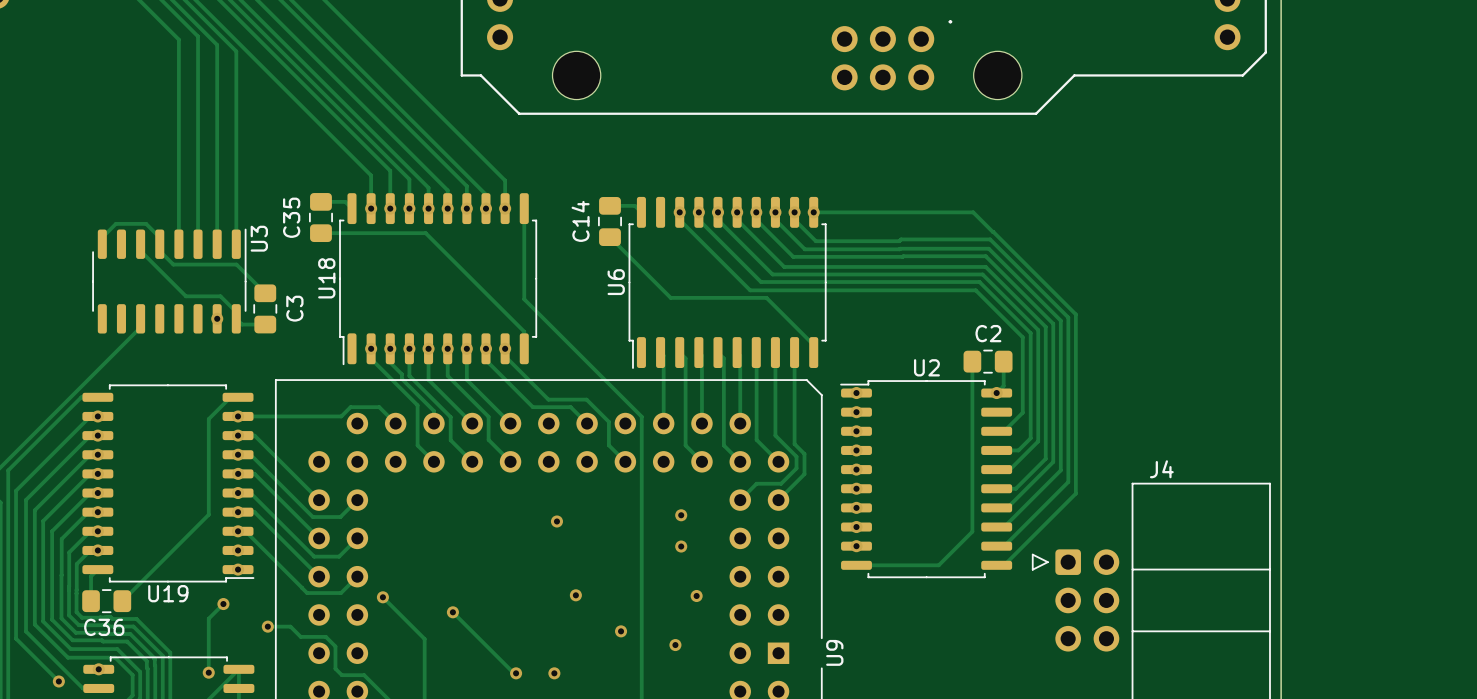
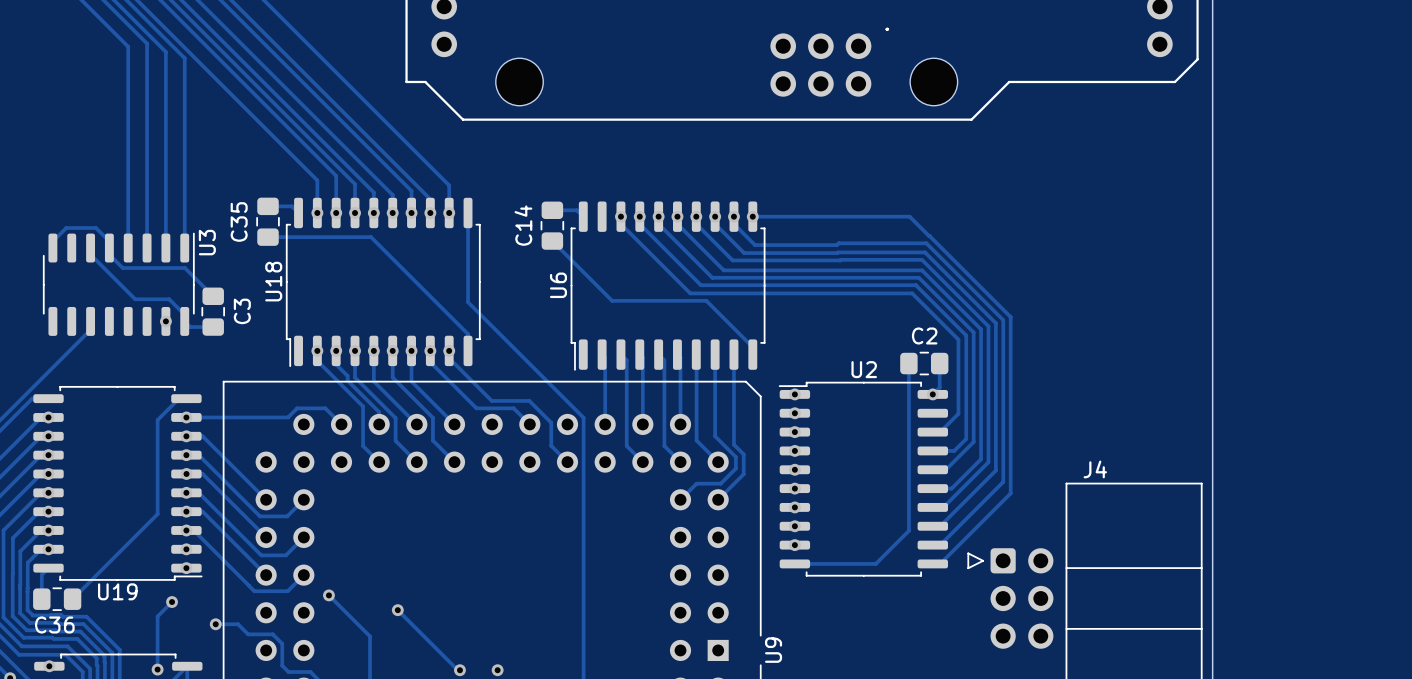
via: (681, 515) -> none
via: (556, 521) -> none
via: (681, 546) -> none
via: (575, 595) -> none
via: (696, 595) -> none
via: (621, 631) -> none
via: (675, 645) -> none

